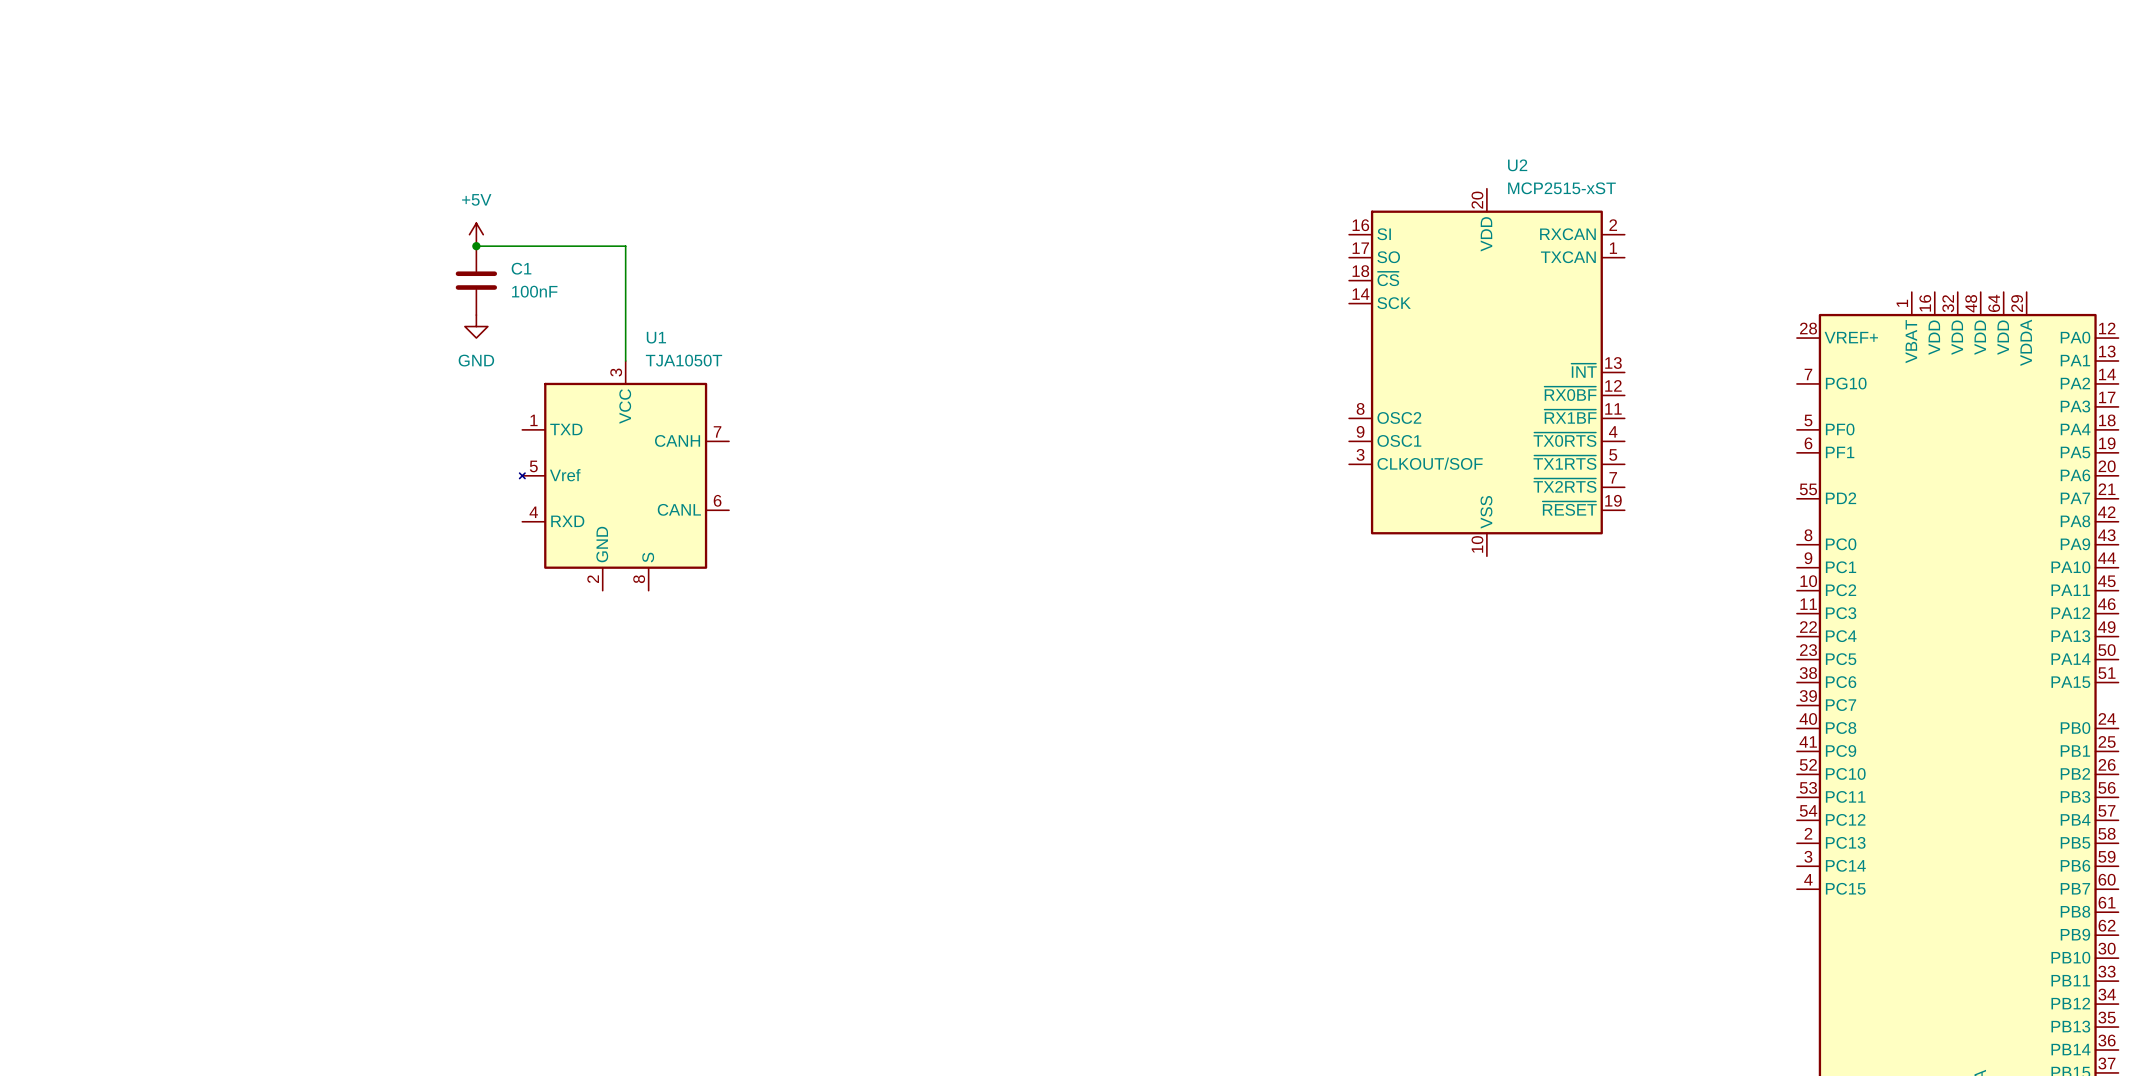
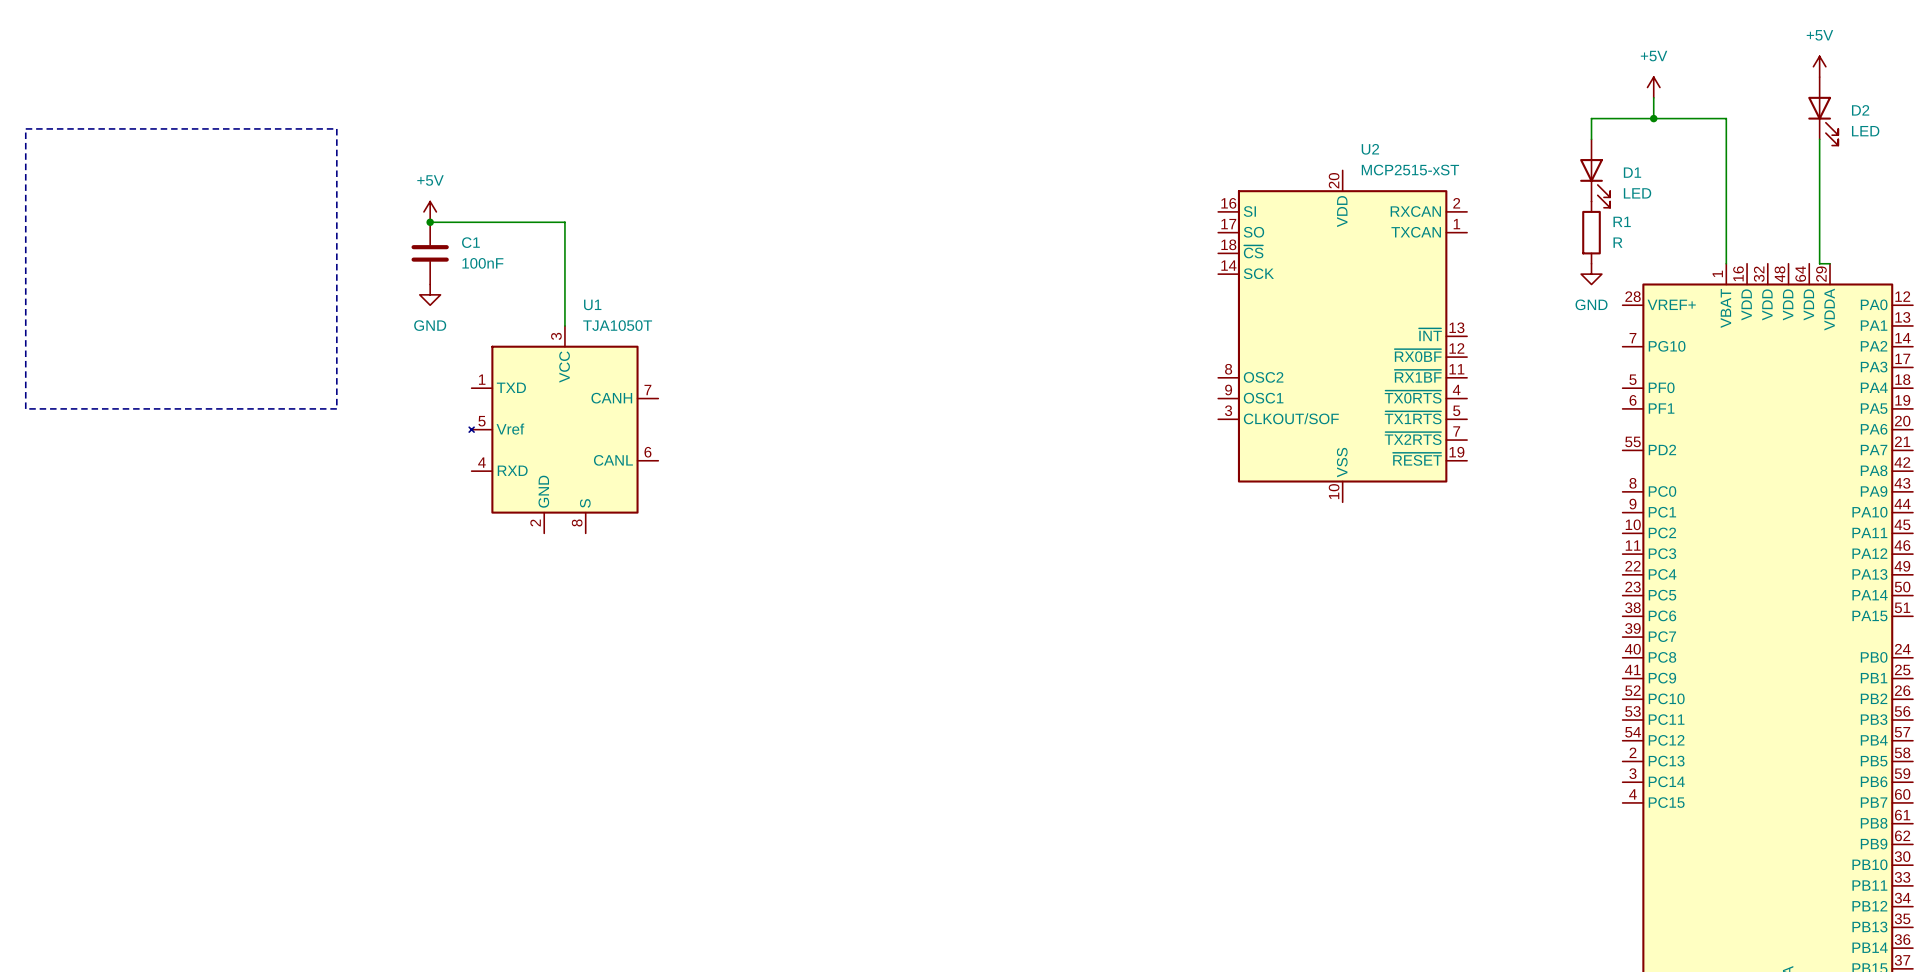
power symbol: none -> +5V (1819, 66)
power symbol: none -> +5V (1653, 87)
wire: none -> (1653, 97) (1653, 118)
D2: none -> LED (1823, 111)
junction: none -> (1653, 118)
line: none -> (25, 128) (336, 128) (336, 408) (25, 408) (25, 128)
wire: none -> (1591, 139) (1591, 118) (1726, 118) (1726, 263)
wire: none -> (1819, 139) (1819, 263) (1830, 263)
D1: none -> LED (1595, 173)
R1: none -> R (1591, 232)
power symbol: none -> GND (1591, 274)

